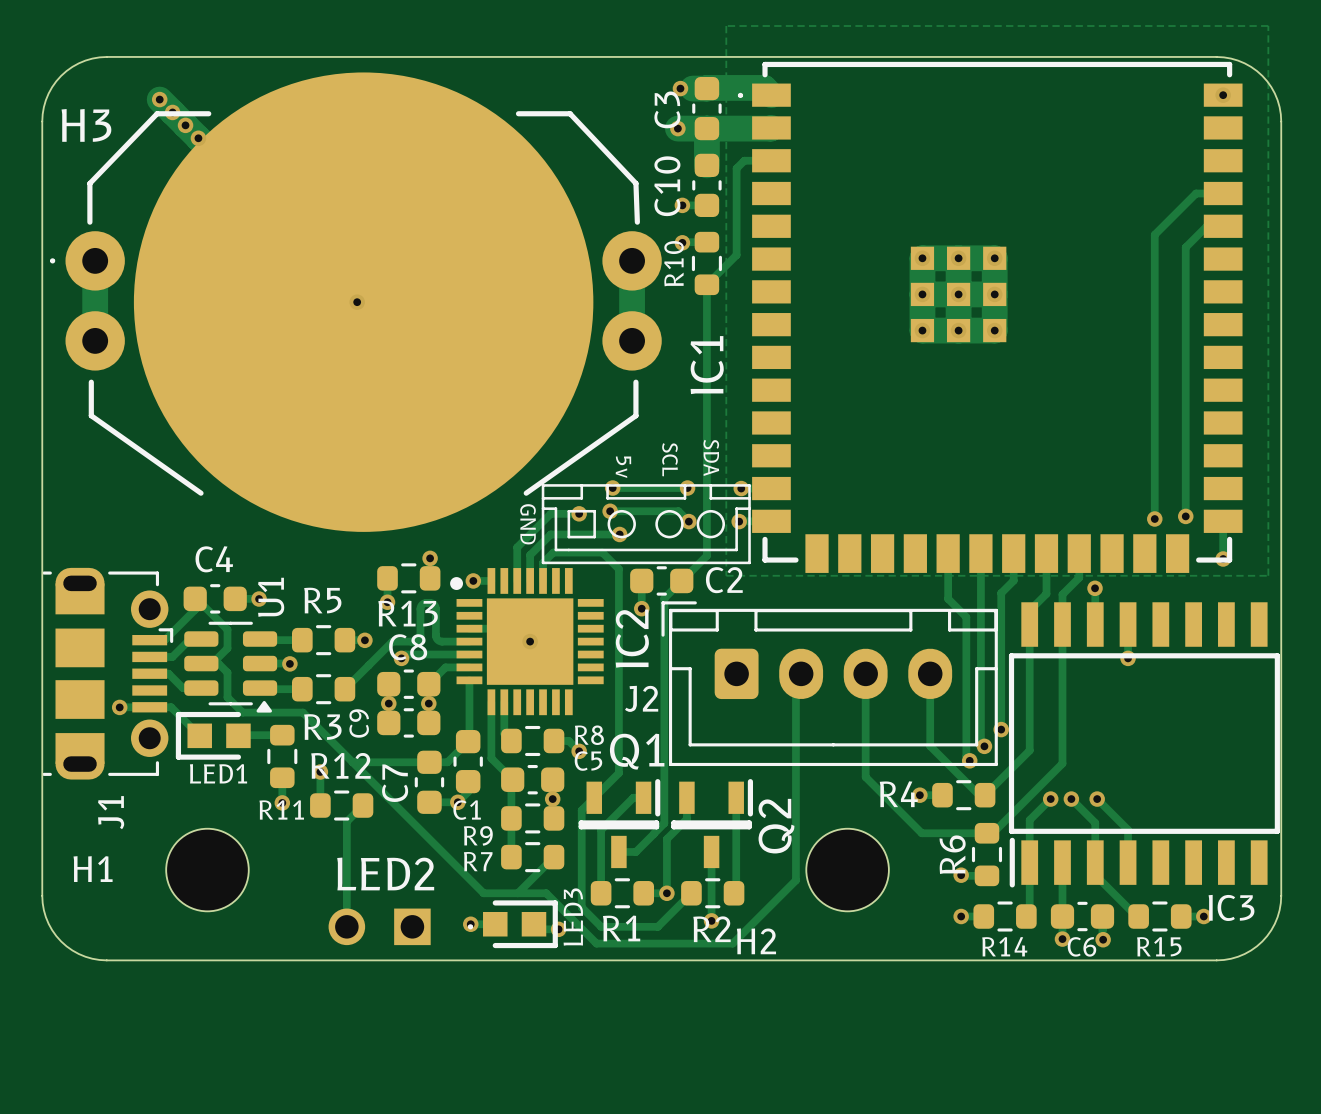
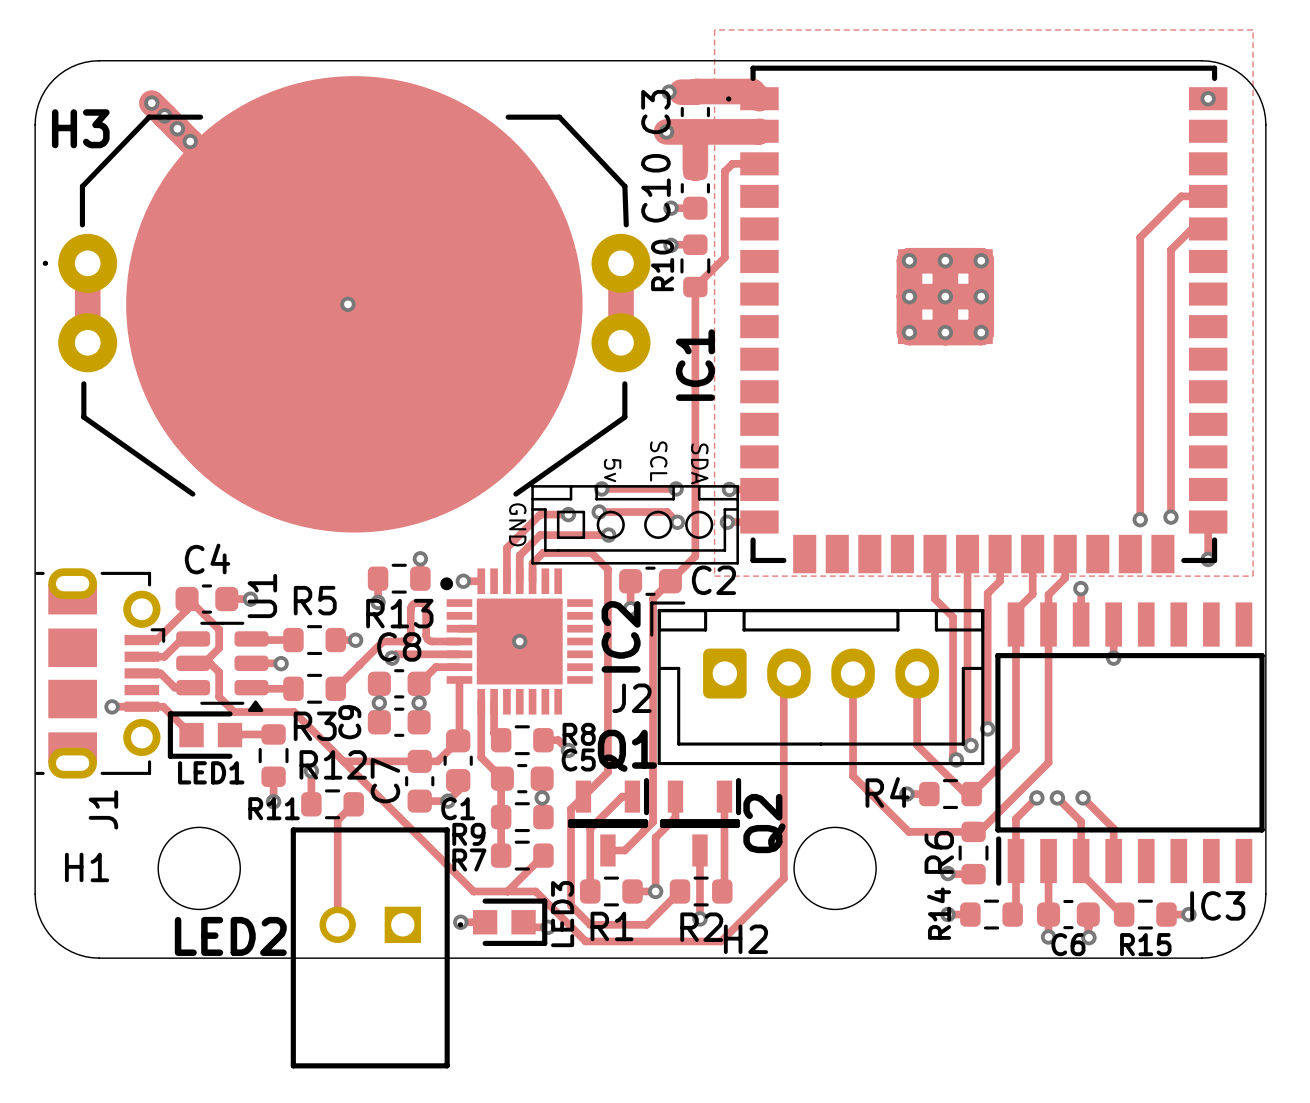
LED2 name position: LED2 (385, 873) -> LED2 (230, 936)
LED2 footprint: [328, 908, 474, 946] -> [290, 827, 464, 1069]
R14 name rotation: 0° (1004, 946) -> 90° counterclockwise (939, 913)

